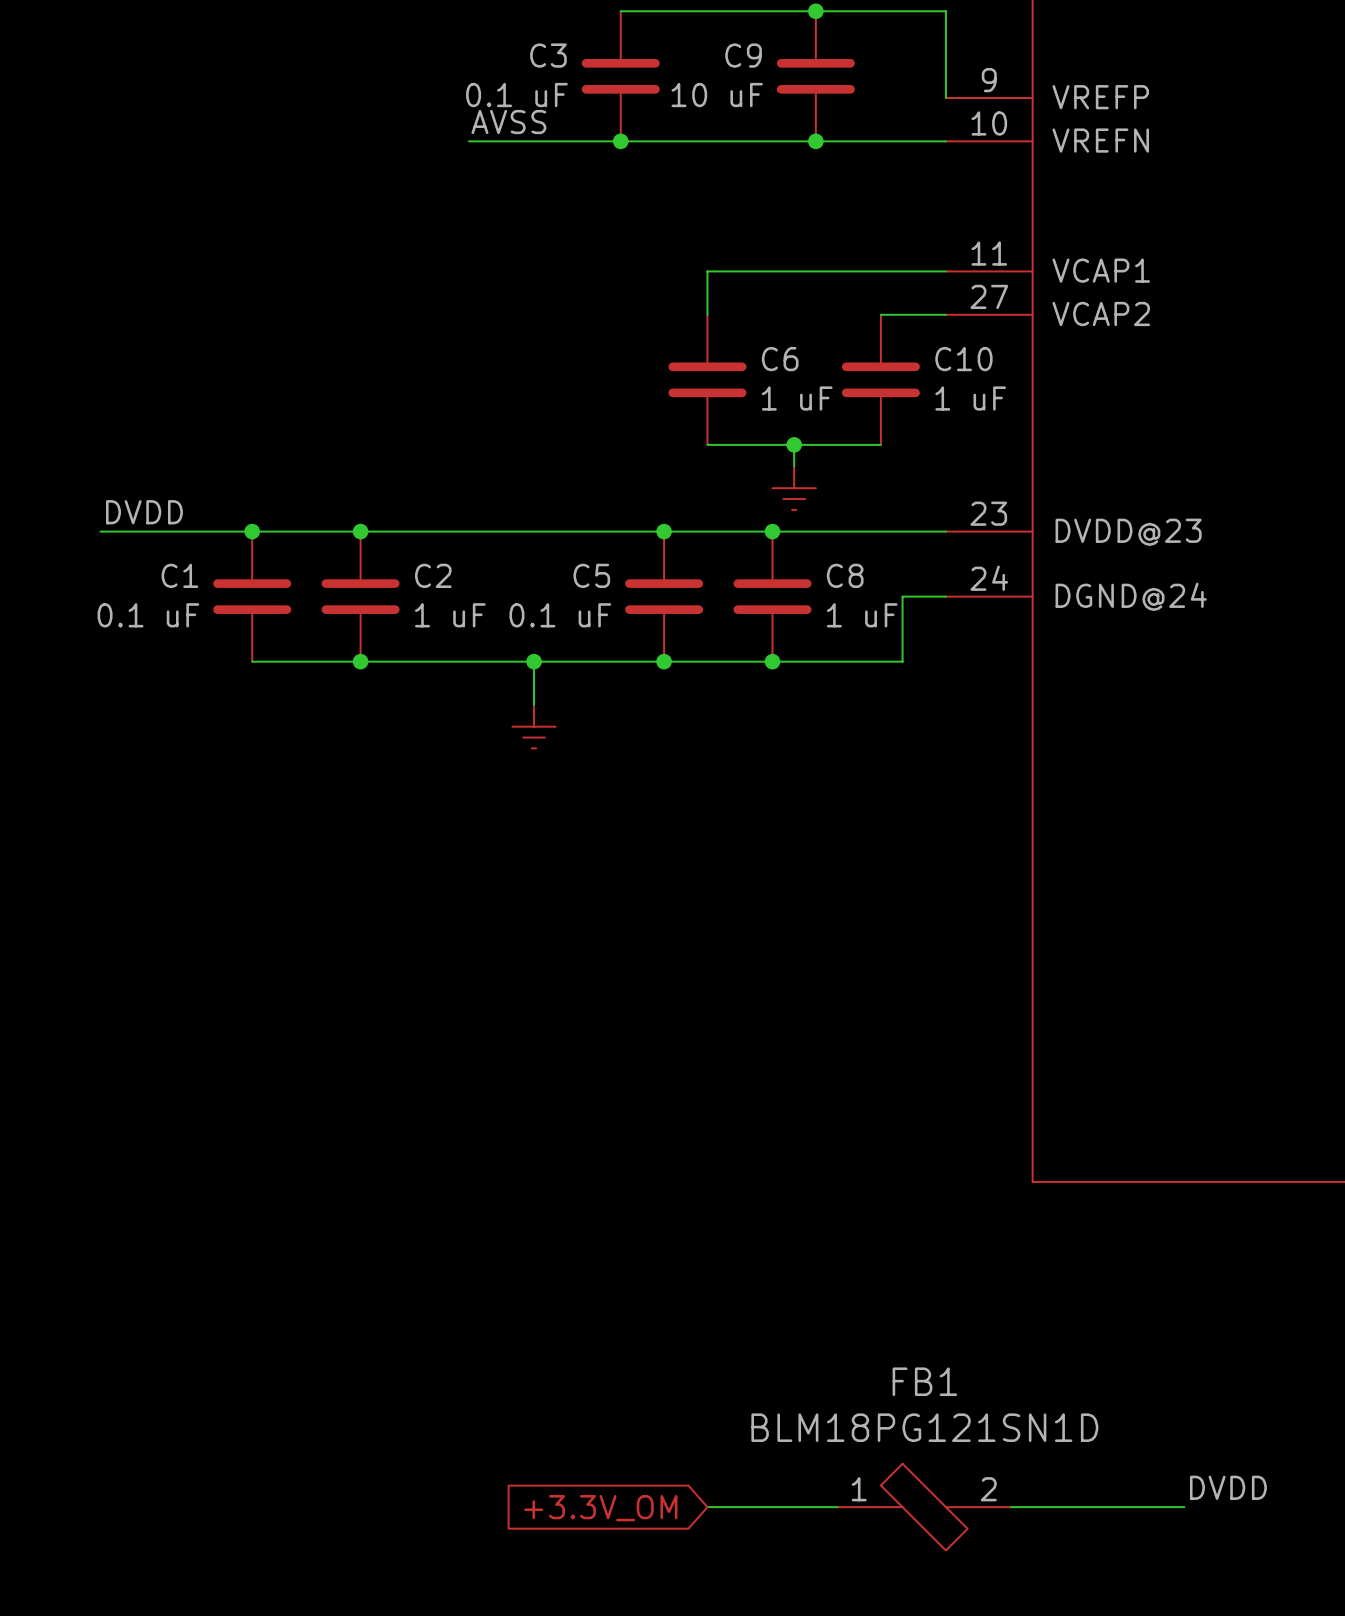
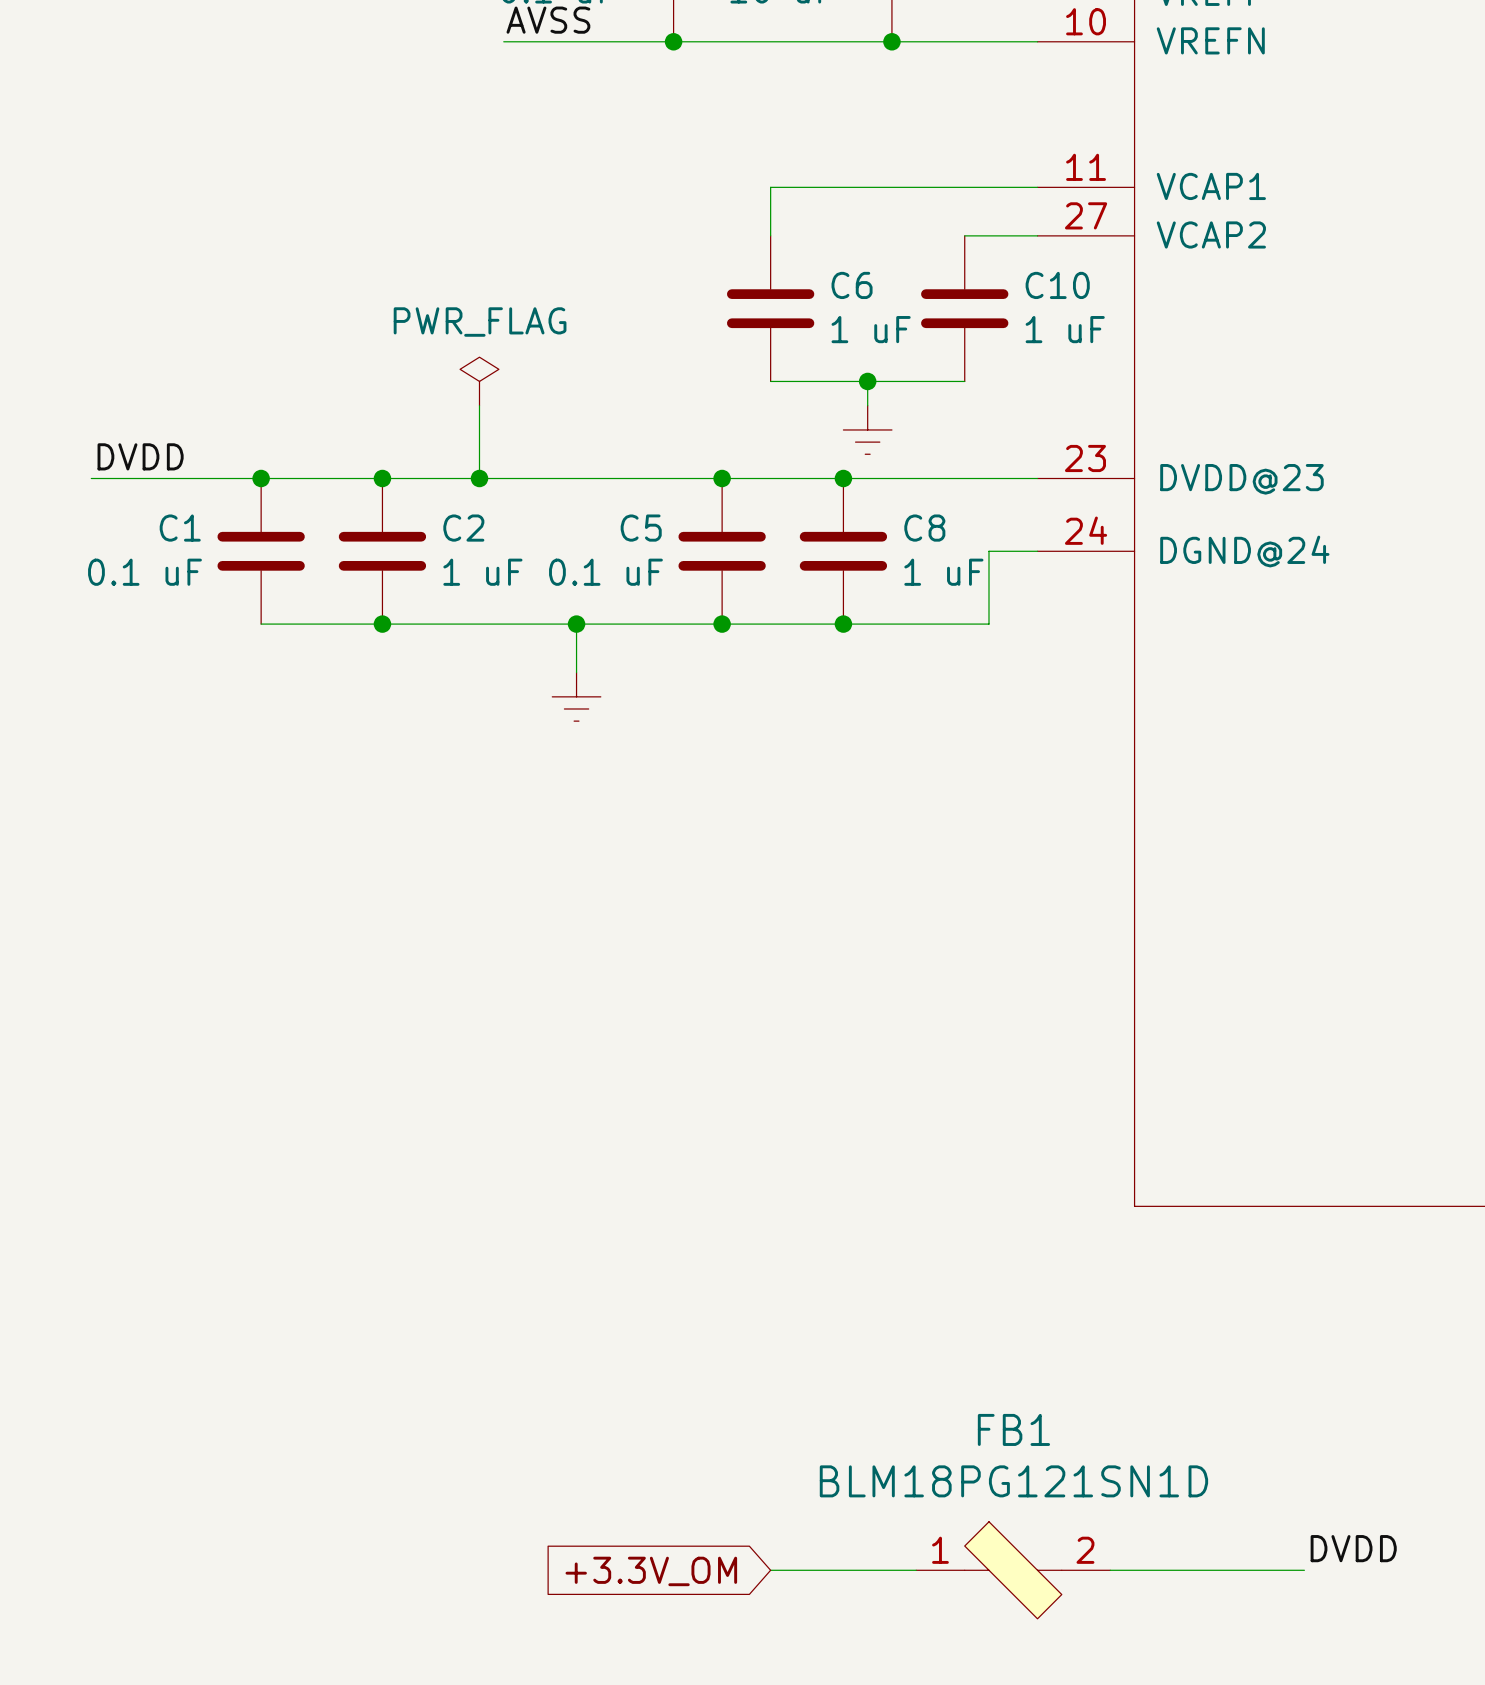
power symbol: none -> PWR_FLAG (479, 381)
wire: none -> (479, 405) (479, 478)
junction: none -> (479, 478)

